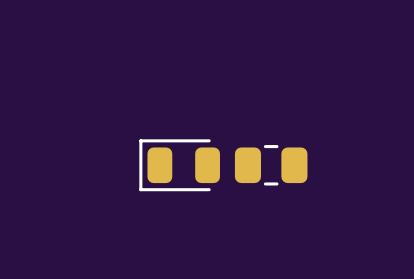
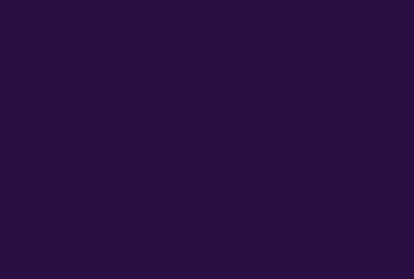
part: (179, 165) -> none
part: (271, 165) -> none

